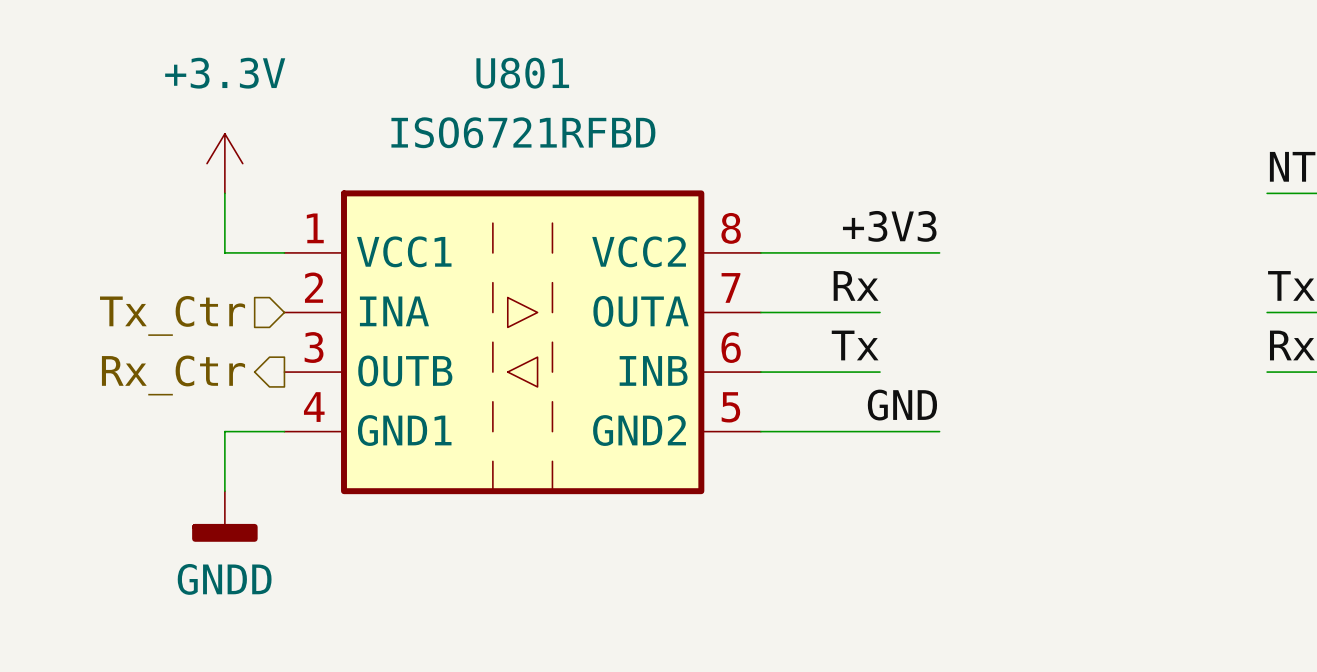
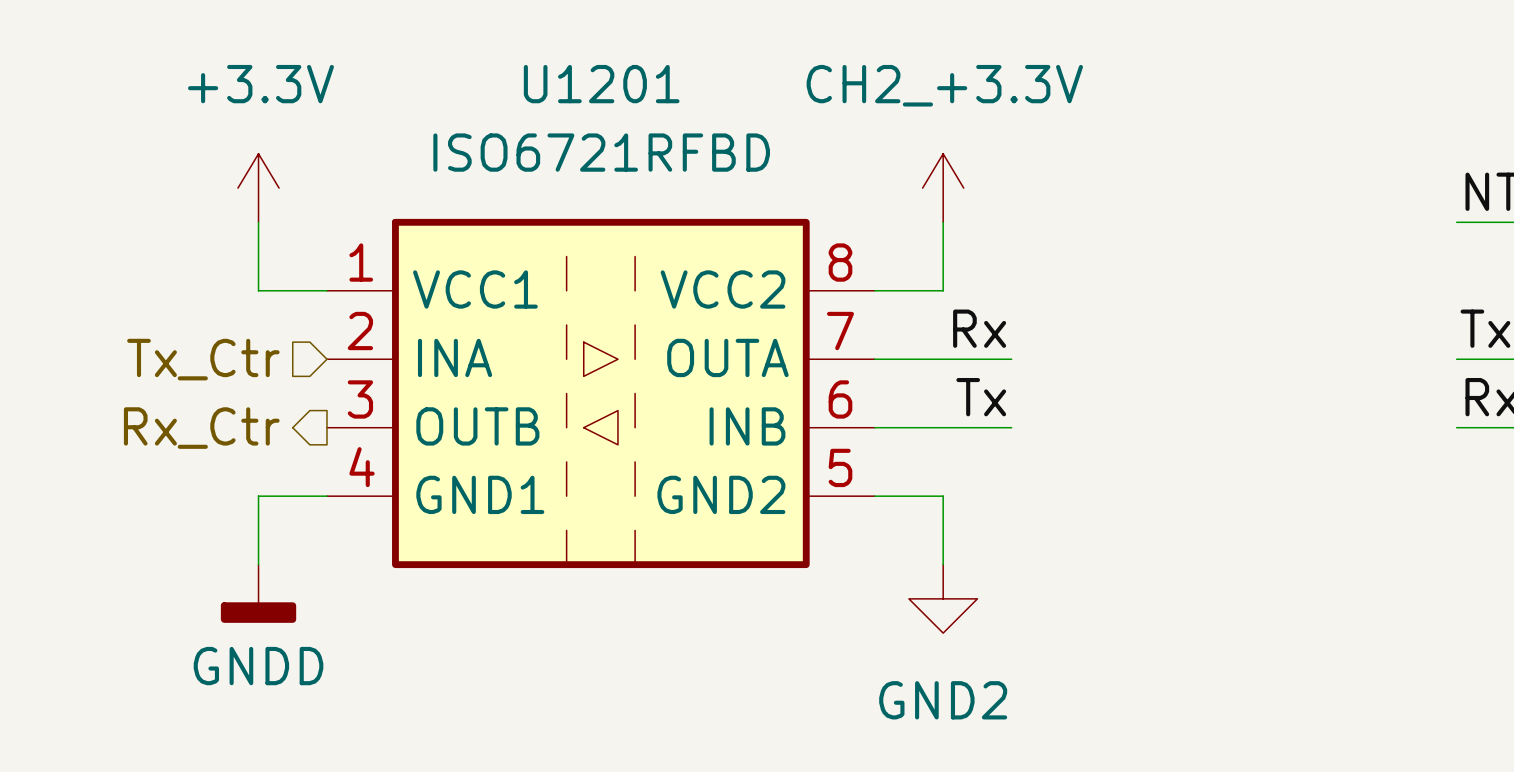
U801 name: U801 (522, 73) -> U1201 (601, 84)
power symbol: none -> CH2_+3.3V (943, 188)
label: +3V3 (889, 226) -> none
wire: (820, 252) (939, 252) -> (943, 290) (943, 222)
label: GND (902, 405) -> none
wire: (820, 431) (939, 431) -> (943, 496) (943, 564)
power symbol: none -> GND2 (943, 598)

